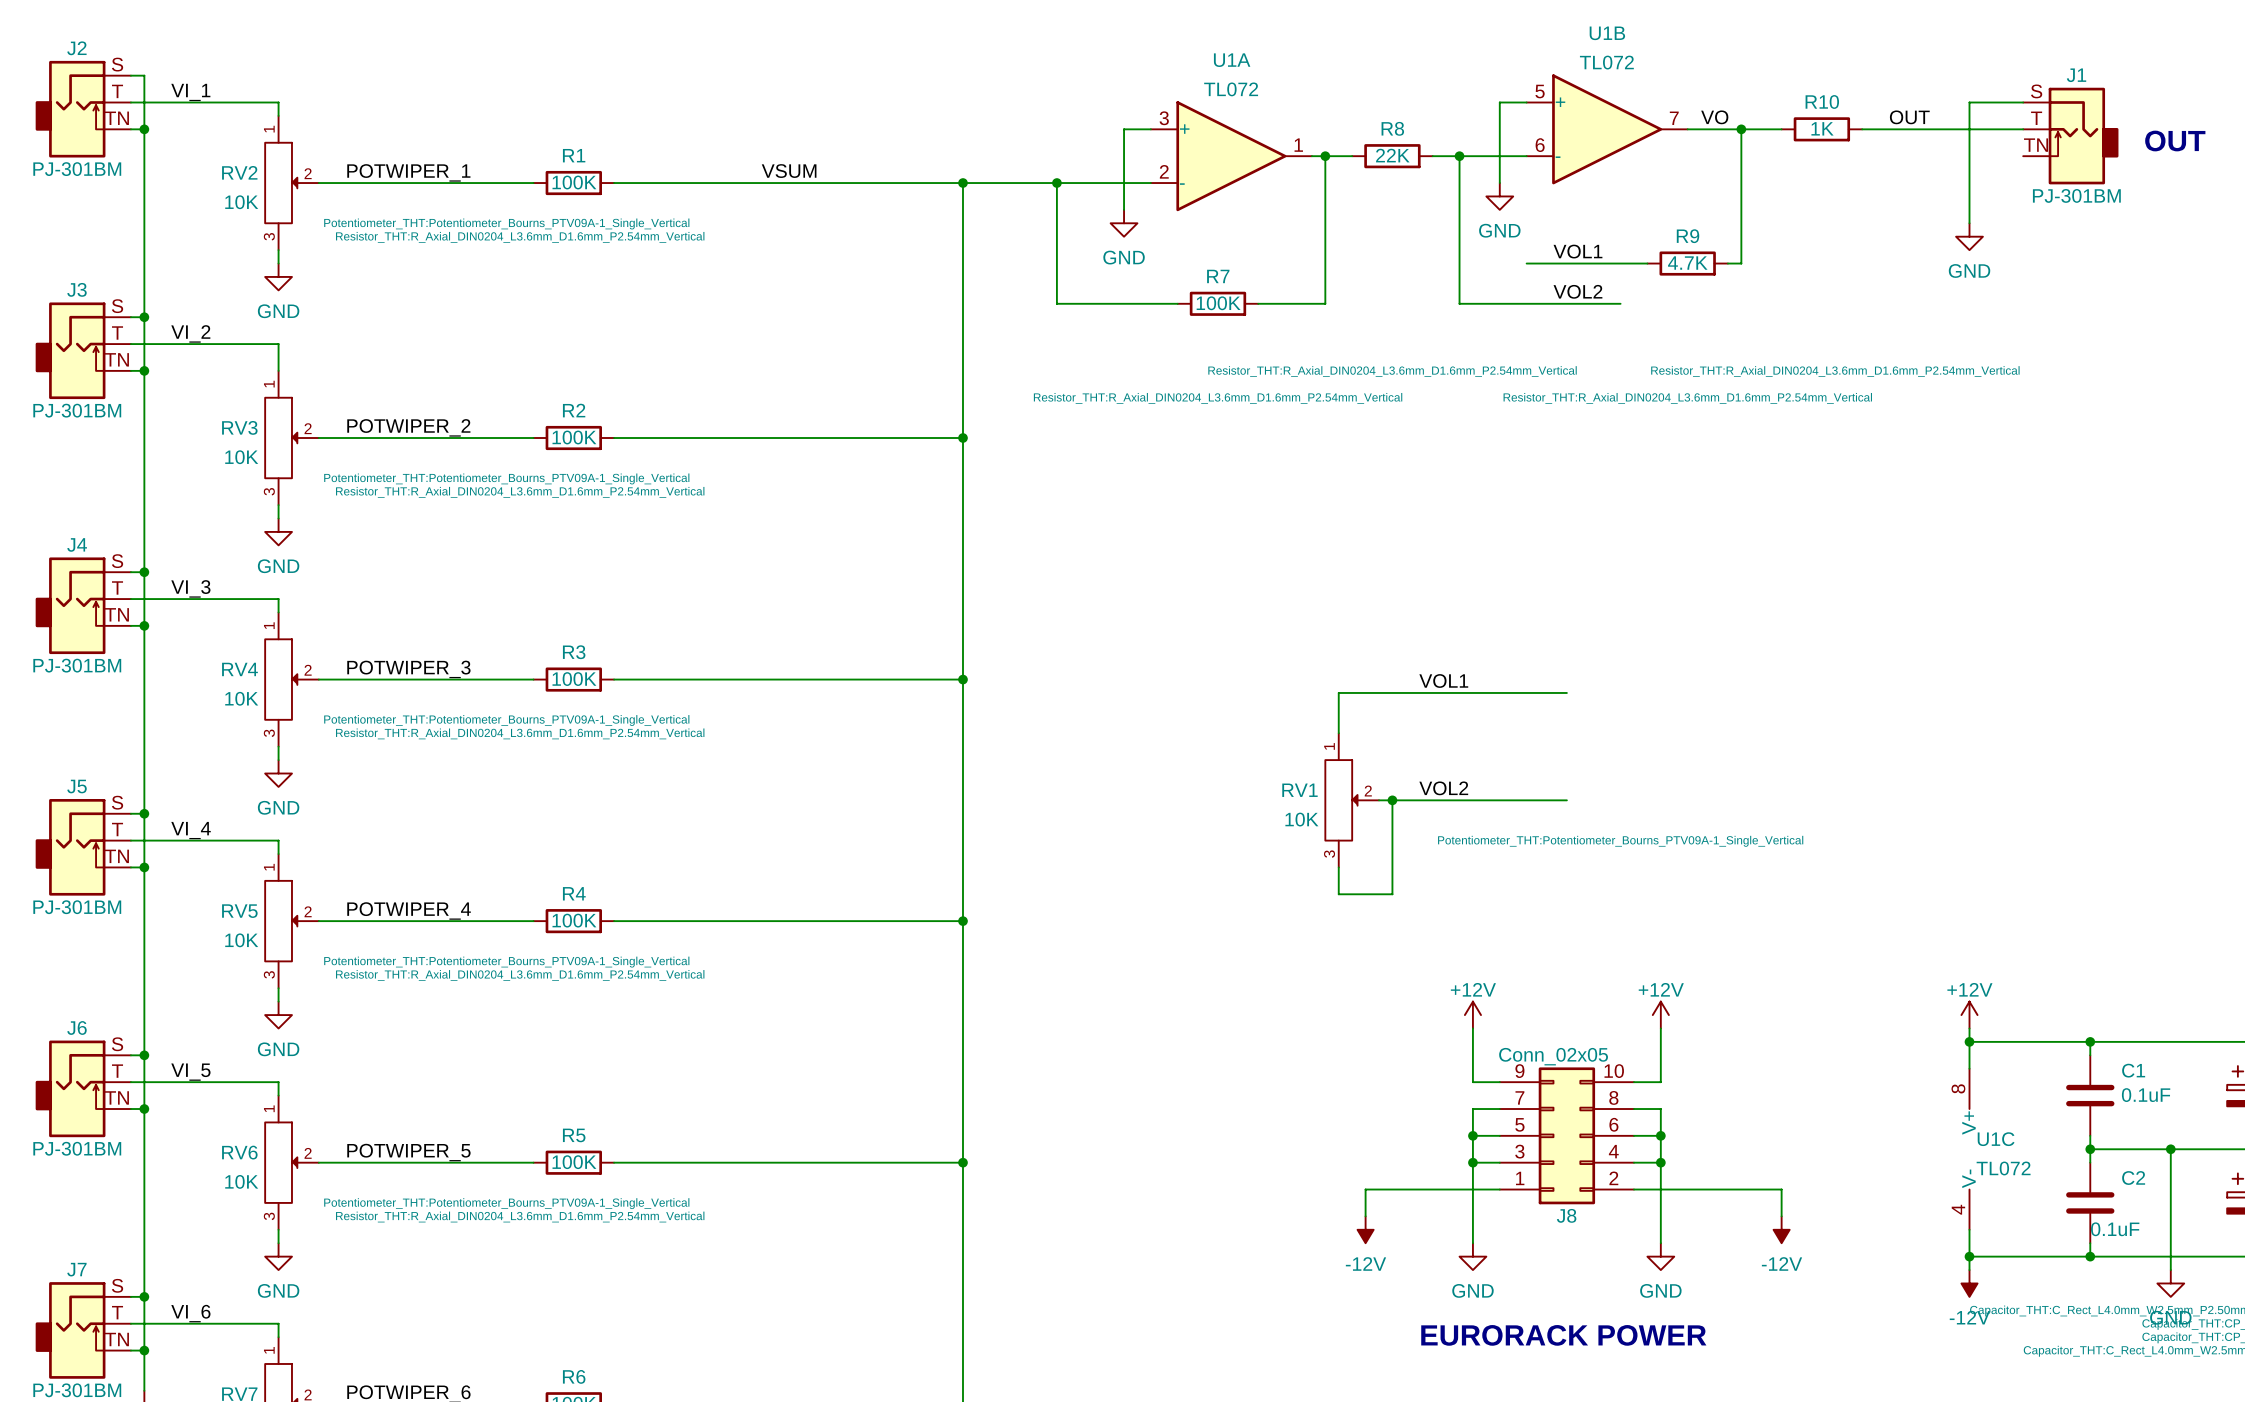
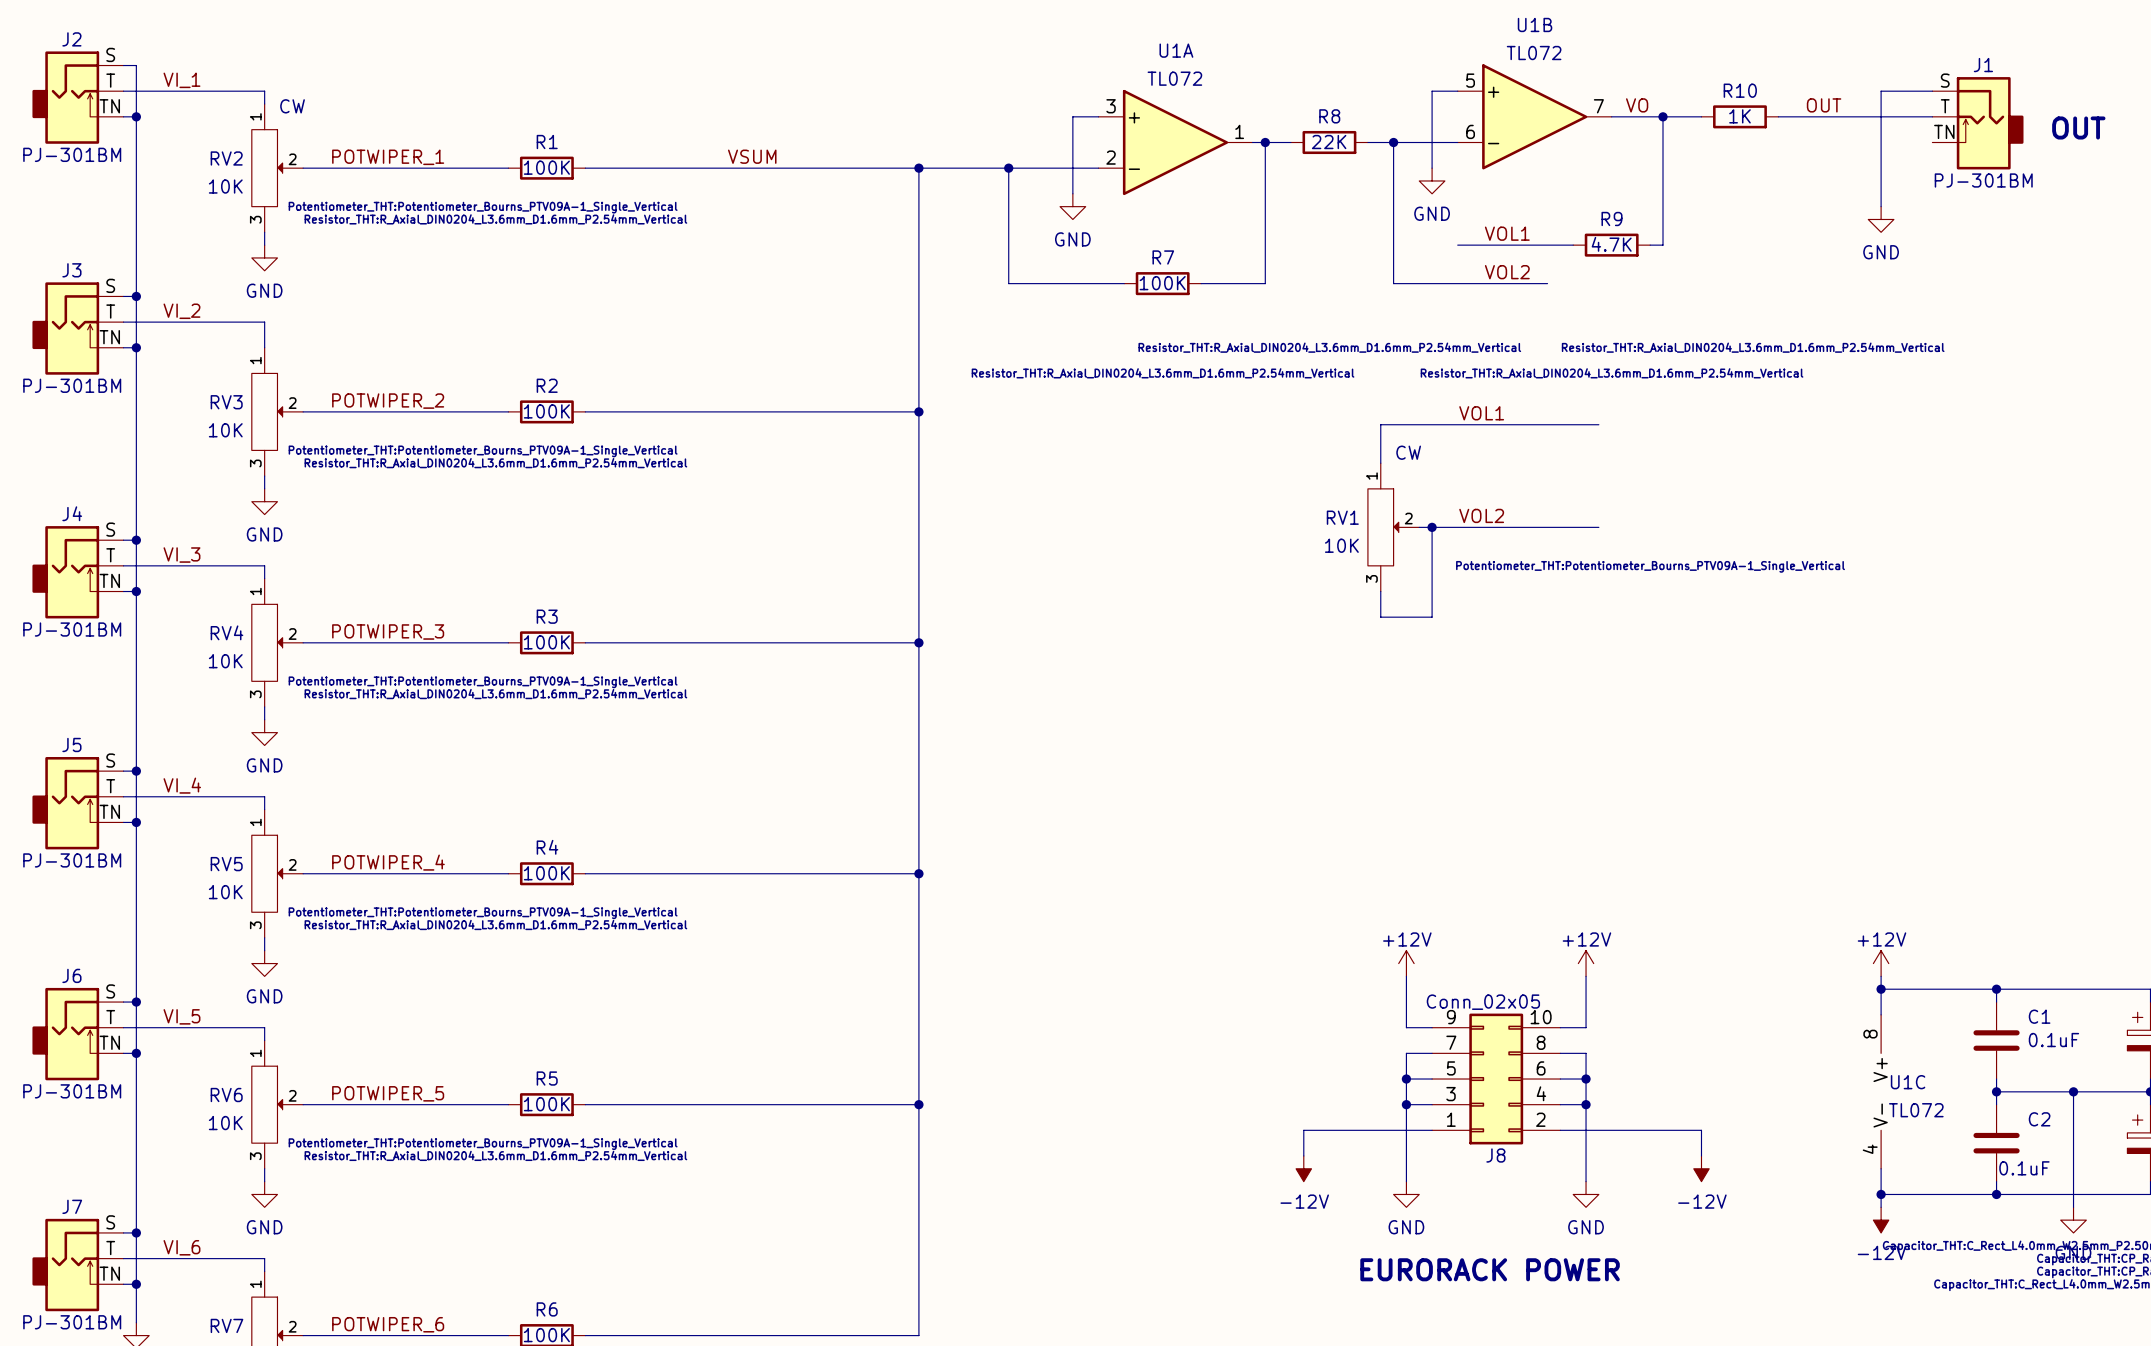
text: none -> CW (292, 106)
label: none -> VOL1 (1481, 413)
wire: none -> (1598, 424) (1380, 424) (1380, 463)
text: none -> CW (1408, 452)
label: none -> VOL2 (1481, 515)
wire: none -> (1419, 527) (1598, 527)
wire: none -> (1432, 527) (1432, 617) (1380, 617) (1380, 591)
junction: none -> (1432, 527)
label: VOL1 (1443, 681) -> none
wire: (1566, 692) (1338, 692) (1338, 733) -> none
label: VOL2 (1443, 788) -> none
RV1 position: (1352, 800) -> (1393, 527)
wire: (1379, 800) (1566, 800) -> none
wire: (1392, 800) (1392, 894) (1338, 894) (1338, 867) -> none
junction: (1392, 800) -> none

